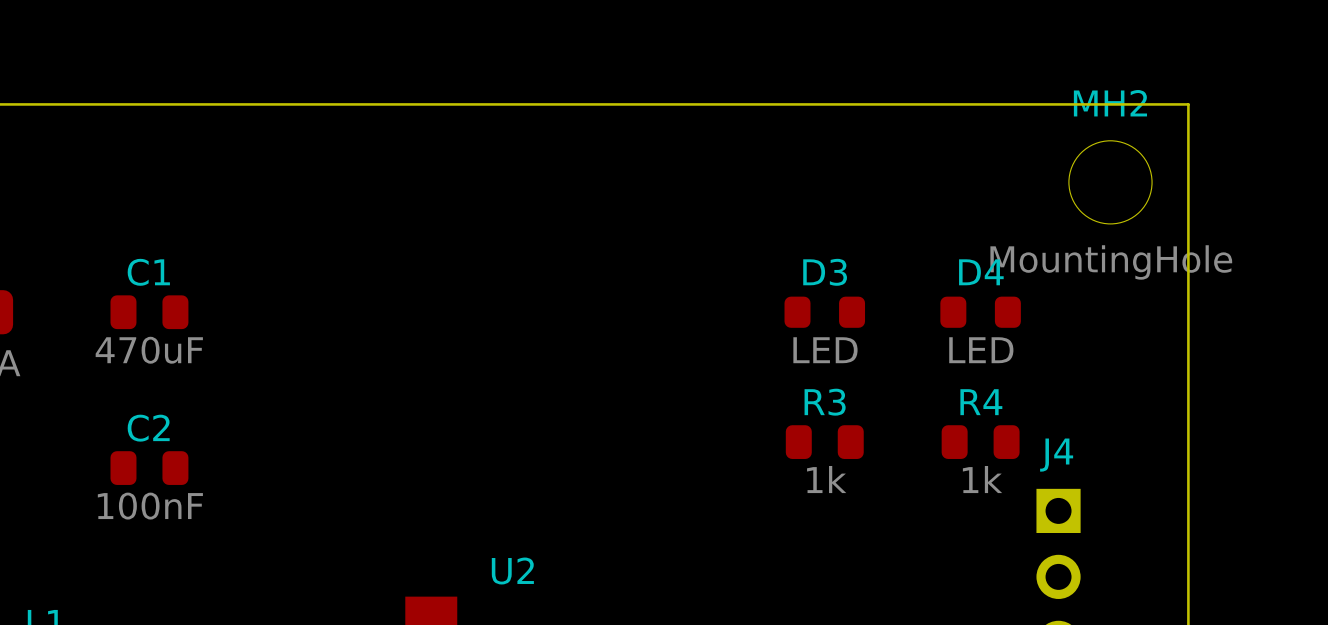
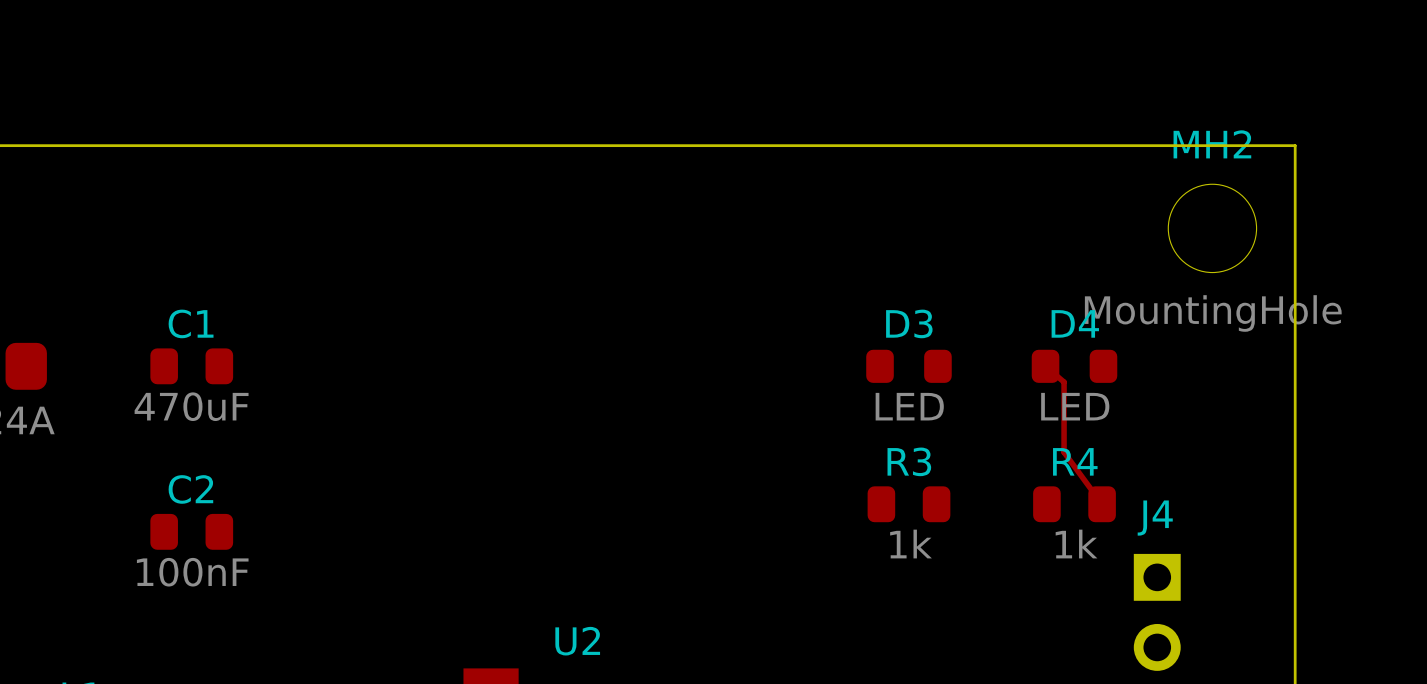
top track: none -> (1045, 366) (1064, 382) (1064, 452) (1102, 504)

